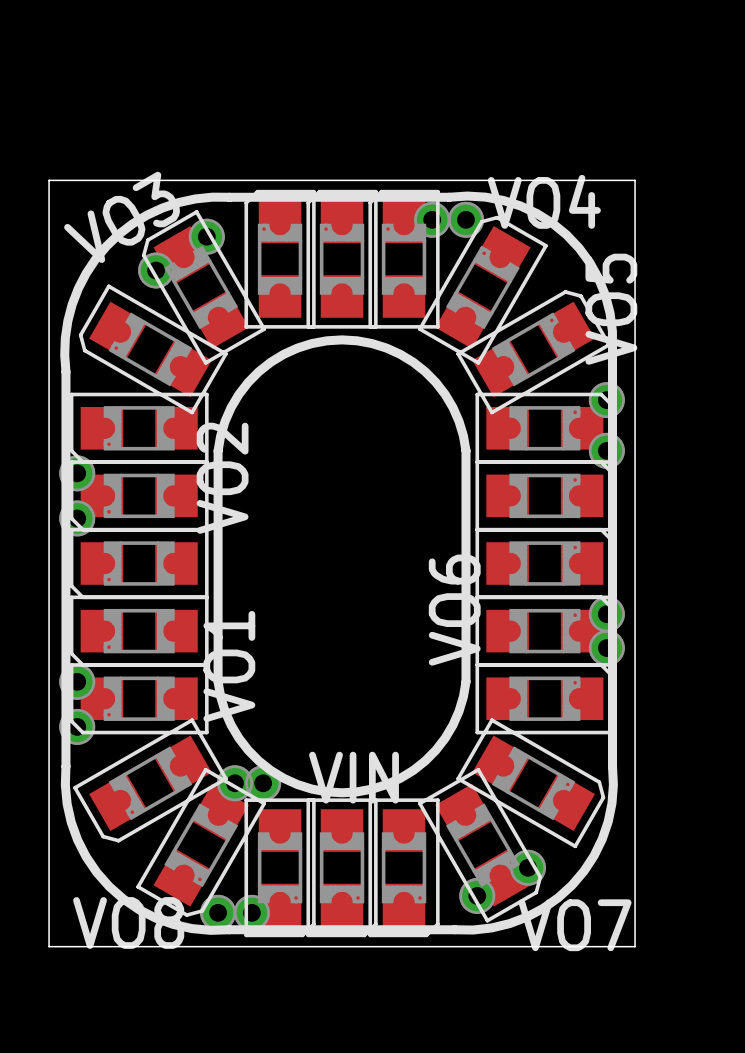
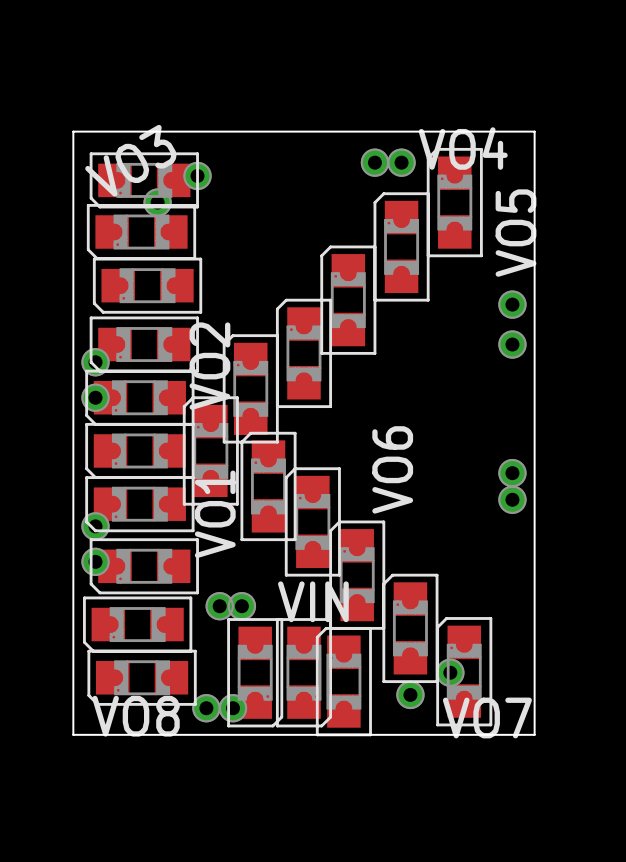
line: (229, 197) (467, 196) (503, 200) (537, 213) (552, 223) (579, 248) (598, 278) (605, 295) (612, 331) (611, 803) (602, 838) (584, 871) (558, 897) (526, 917) (509, 923) (473, 930) (210, 930) (191, 928) (155, 918) (123, 898) (96, 872) (77, 840) (71, 822) (65, 785) (64, 354) (67, 321) (78, 288) (86, 273) (95, 259) (118, 234) (147, 215) (162, 207) (195, 198) (229, 197) -> none
part: none -> (144, 180)
part: (280, 259) -> none
part: (342, 259) -> none
part: (404, 259) -> none
part: none -> (454, 202)
part: (204, 287) -> none
part: (482, 290) -> none
part: none -> (141, 232)
part: none -> (401, 246)
part: (153, 349) -> none
part: (533, 352) -> none
part: none -> (147, 285)
part: none -> (348, 300)
part: (139, 428) -> none
part: (544, 428) -> none
part: none -> (144, 344)
line: (218, 450) (218, 681) (220, 696) (231, 725) (248, 750) (258, 761) (270, 770) (297, 784) (326, 791) (342, 792) (372, 789) (400, 778) (425, 761) (445, 738) (459, 711) (466, 681) (466, 450) (463, 435) (452, 407) (445, 394) (425, 371) (400, 354) (372, 343) (357, 340) (326, 340) (311, 343) (283, 354) (258, 371) (238, 394) (231, 407) (220, 435) (218, 450) -> none
part: none -> (303, 353)
part: (139, 495) -> none
part: (544, 495) -> none
part: none -> (250, 388)
part: none -> (139, 397)
part: (139, 563) -> none
part: (544, 563) -> none
part: none -> (139, 450)
part: none -> (210, 450)
part: (139, 631) -> none
part: none -> (268, 486)
part: (544, 631) -> none
part: none -> (139, 504)
part: none -> (312, 521)
part: (139, 698) -> none
part: (544, 698) -> none
part: none -> (144, 566)
part: none -> (357, 575)
part: (150, 780) -> none
part: (530, 783) -> none
part: none -> (137, 624)
part: none -> (410, 628)
part: (201, 842) -> none
part: (480, 845) -> none
part: none -> (464, 671)
part rotation: 0° (404, 867) -> 180° (343, 681)
part: none -> (142, 677)

